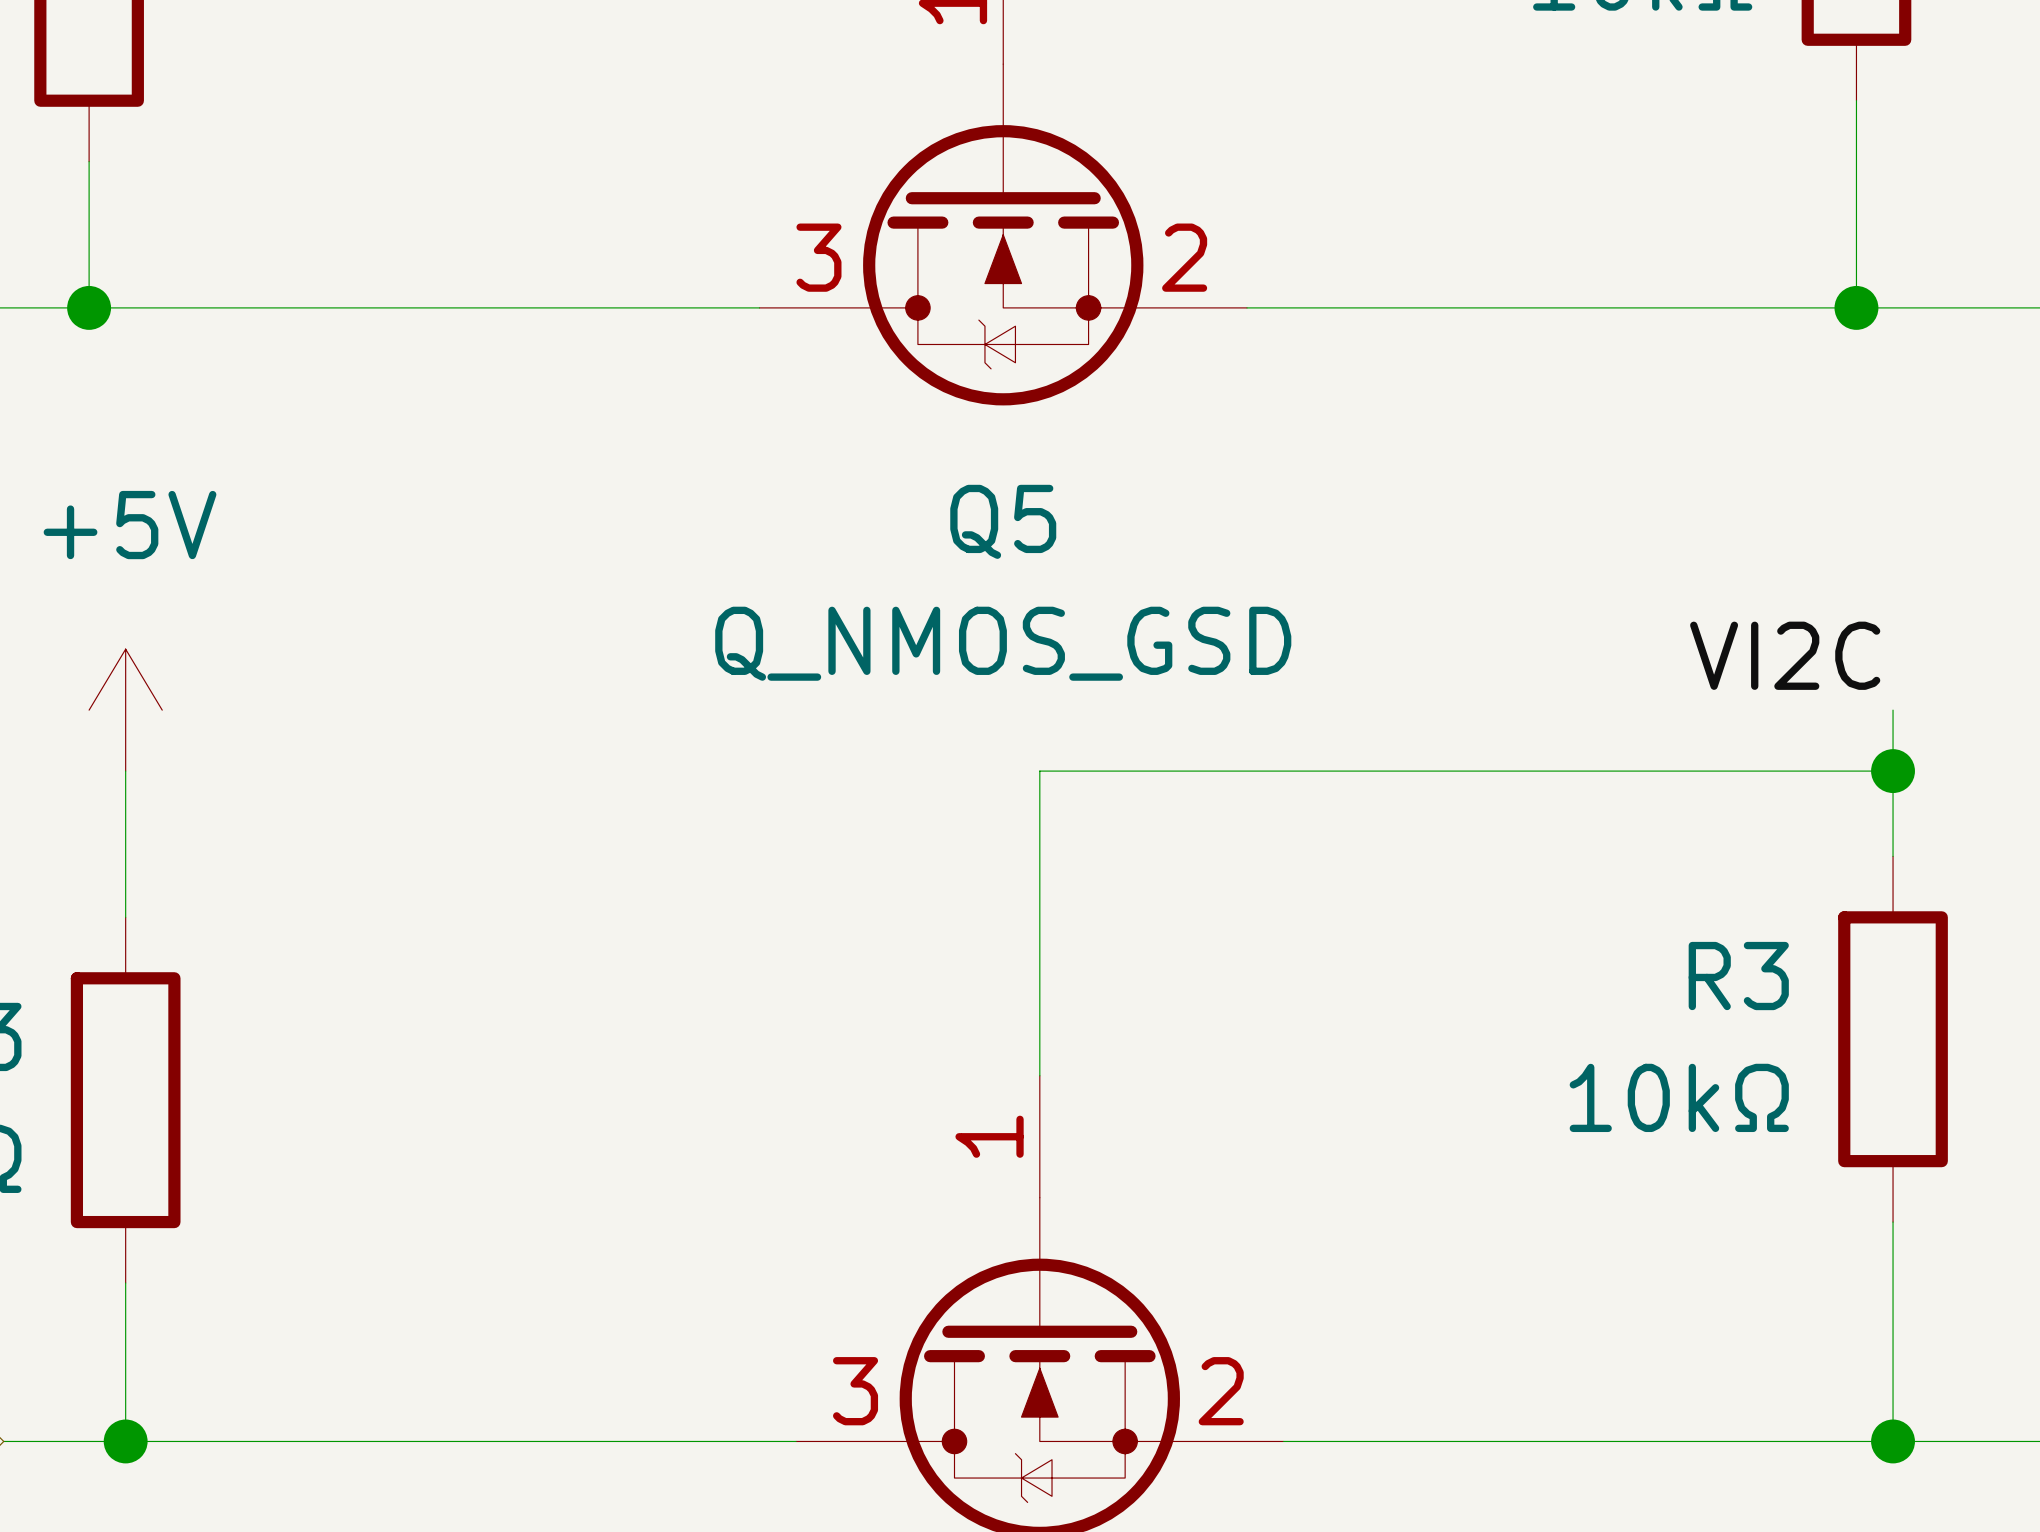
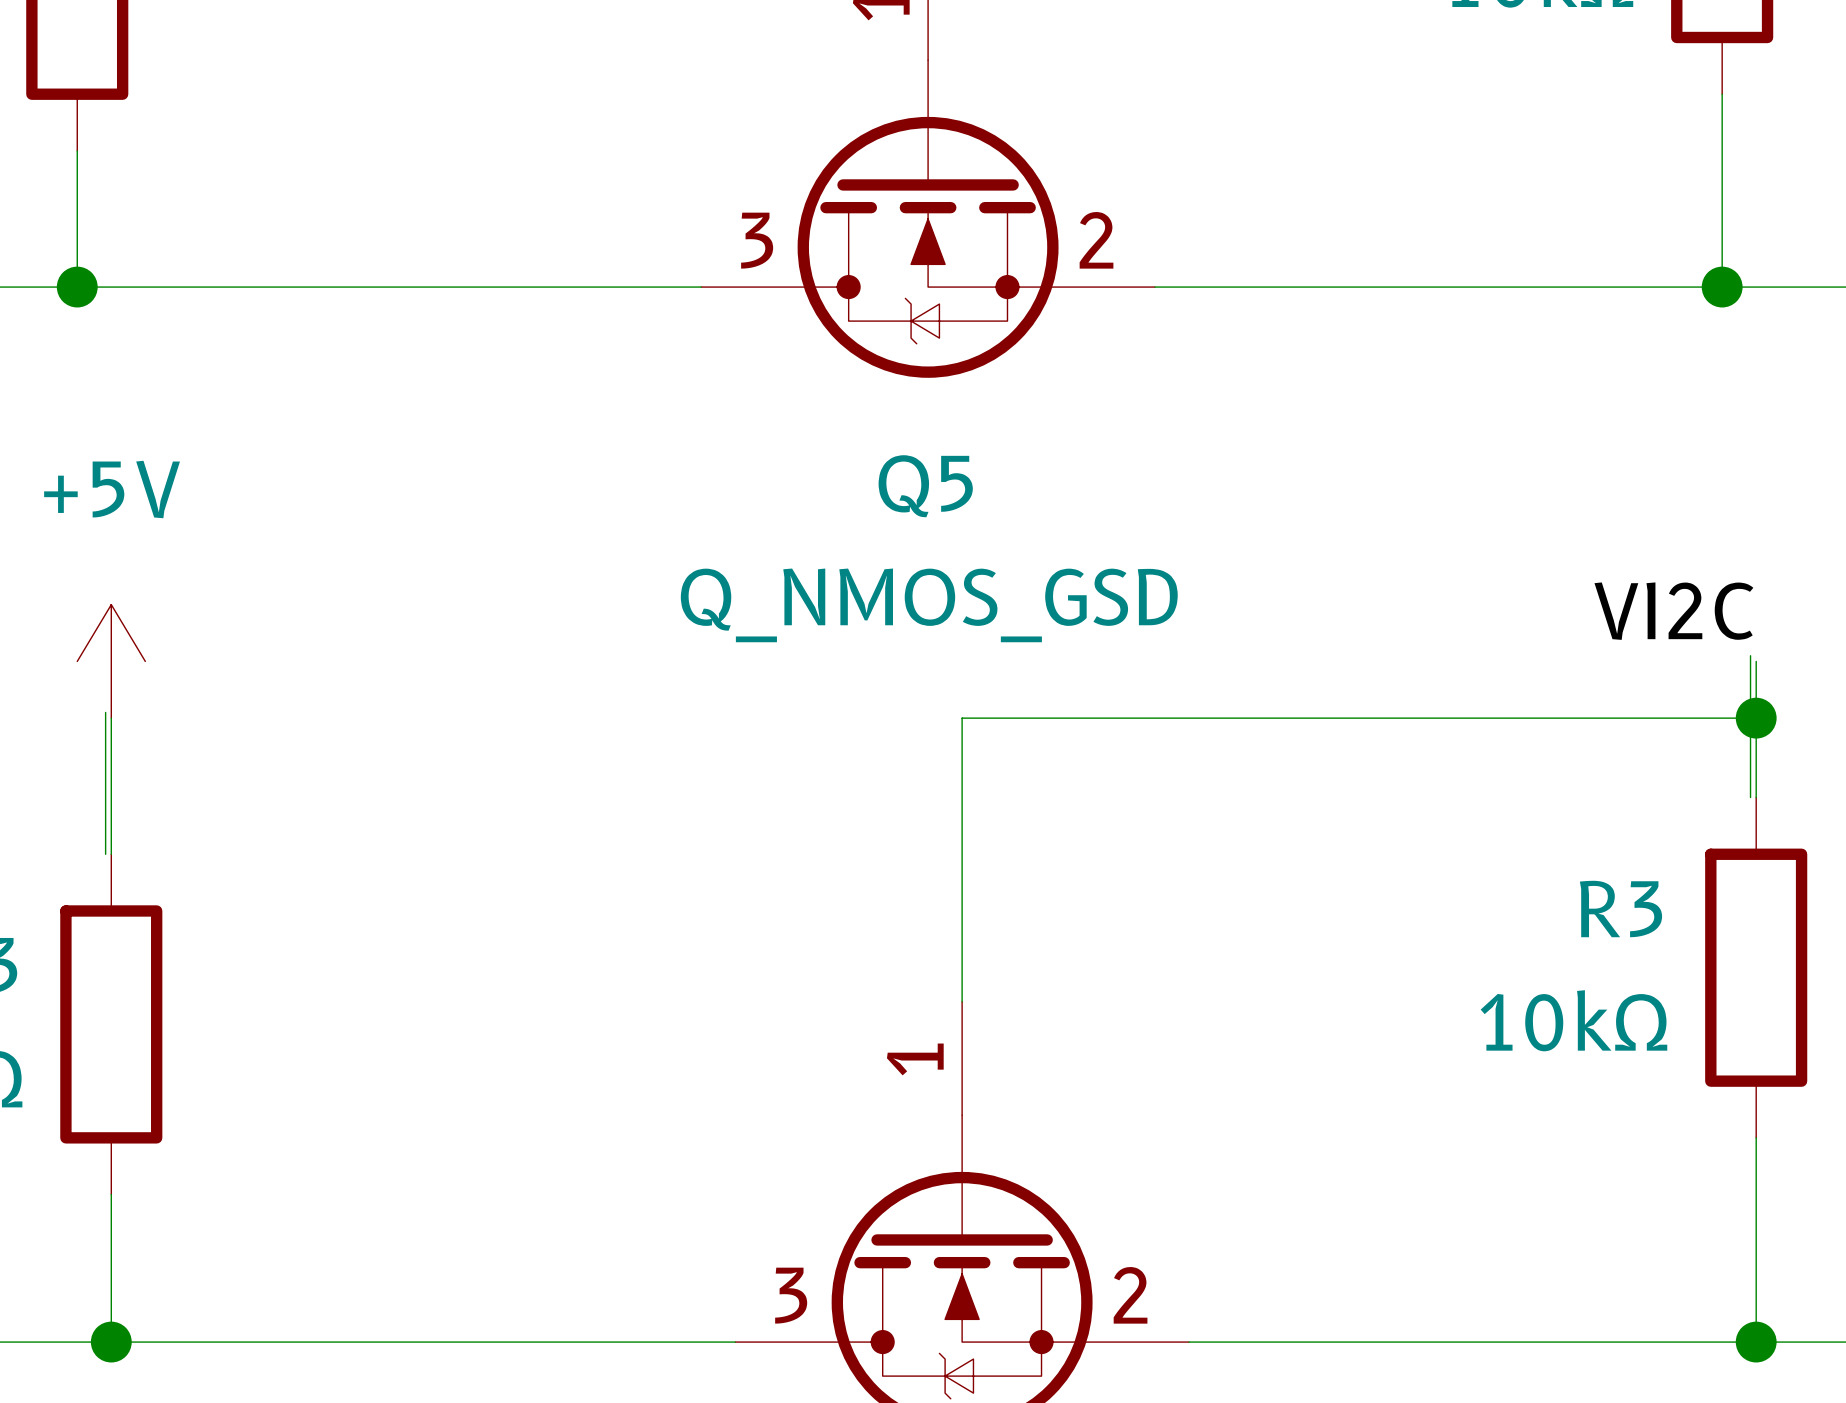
wire: none -> (1750, 655) (1750, 797)
wire: none -> (105, 712) (105, 854)

